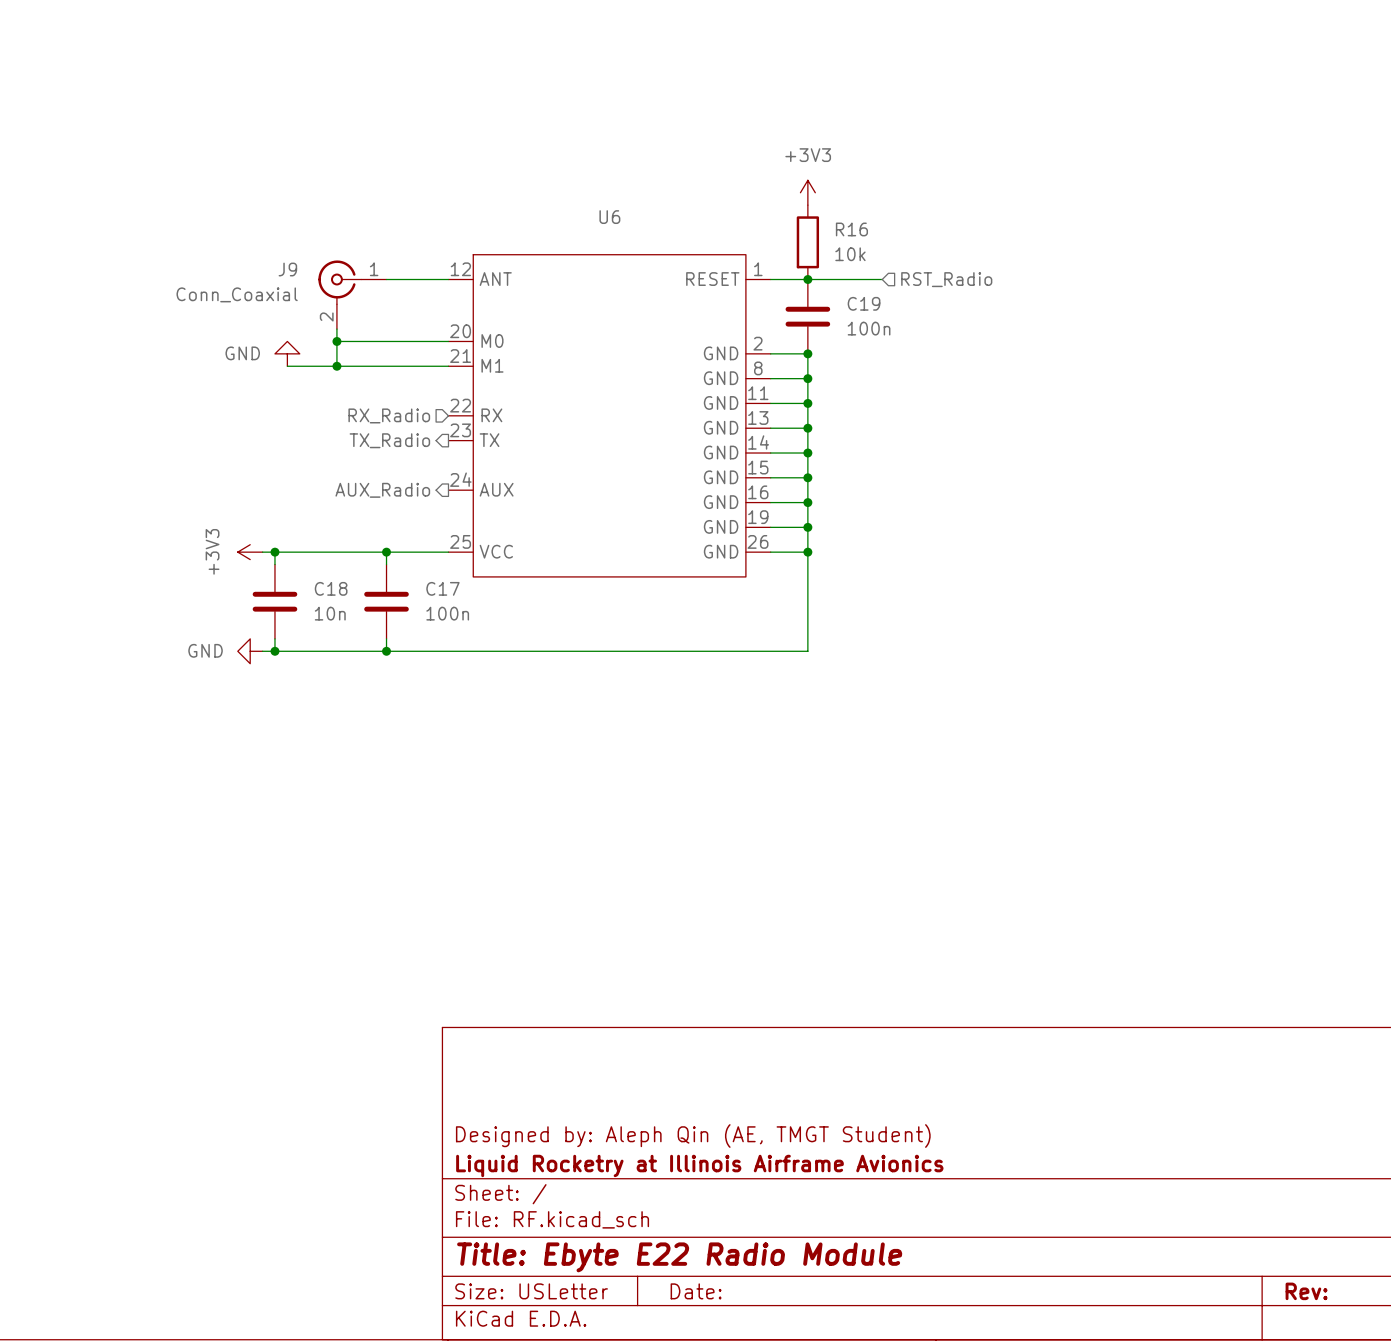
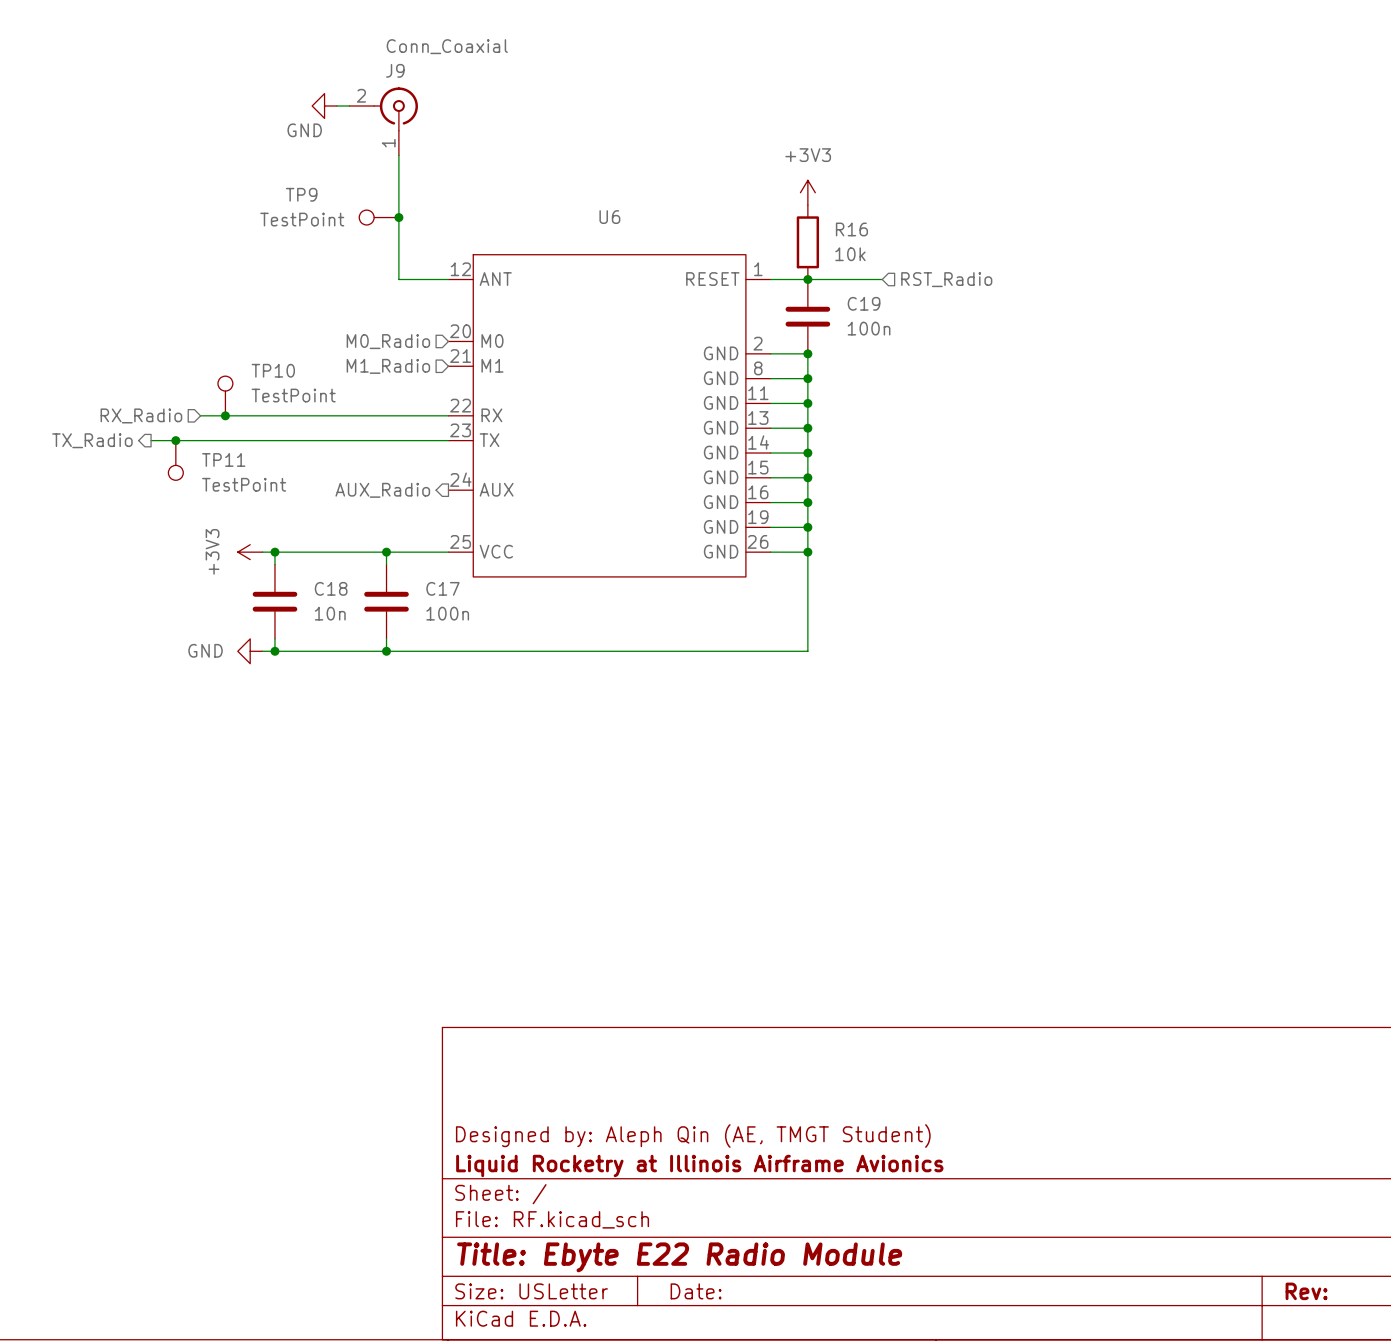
power symbol: none -> GND (324, 106)
wire: none -> (336, 106) (349, 106)
TP9: none -> TestPoint (379, 217)
junction: none -> (398, 217)
J9 name position: J9 (287, 269) -> J9 (395, 70)
wire: (386, 279) (398, 279) -> (398, 155) (398, 279)
J9 rotation: 0° (340, 282) -> 90° clockwise (396, 109)
J9 value position: Conn_Coaxial (237, 294) -> Conn_Coaxial (447, 46)
J9 position: (352, 294) -> (383, 121)
wire: (336, 329) (336, 366) -> none
wire: (336, 341) (448, 341) -> none
junction: (336, 341) -> none
hierarchical label: none -> M0_Radio (388, 341)
power symbol: GND (287, 353) -> none
wire: (287, 366) (448, 366) -> none
junction: (336, 366) -> none
hierarchical label: none -> M1_Radio (388, 366)
TP10: none -> TestPoint (225, 396)
hierarchical label: none -> RX_Radio (141, 415)
wire: none -> (200, 415) (448, 415)
junction: none -> (225, 415)
hierarchical label: RX_Radio (389, 415) -> none
hierarchical label: none -> TX_Radio (92, 440)
wire: none -> (151, 440) (448, 440)
junction: none -> (175, 440)
hierarchical label: TX_Radio (389, 440) -> none
TP11: none -> TestPoint (175, 460)

